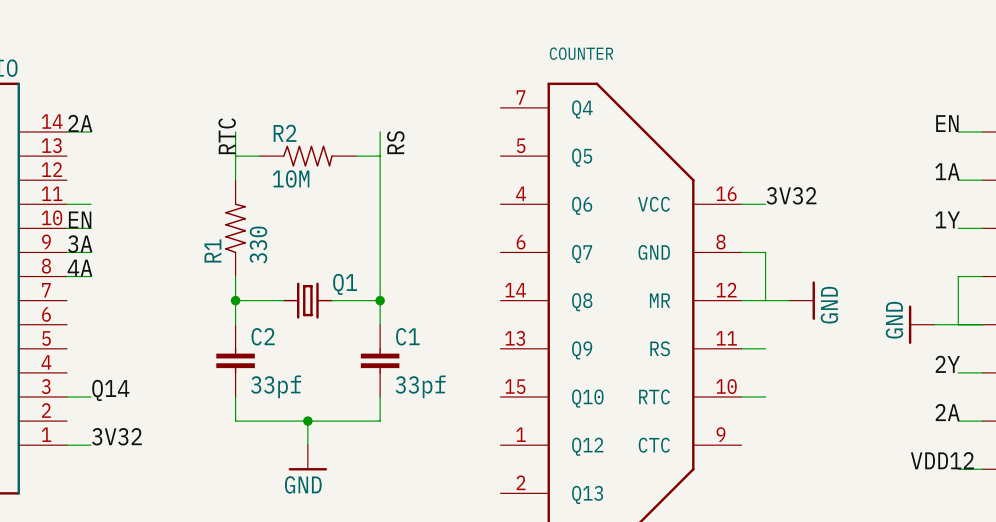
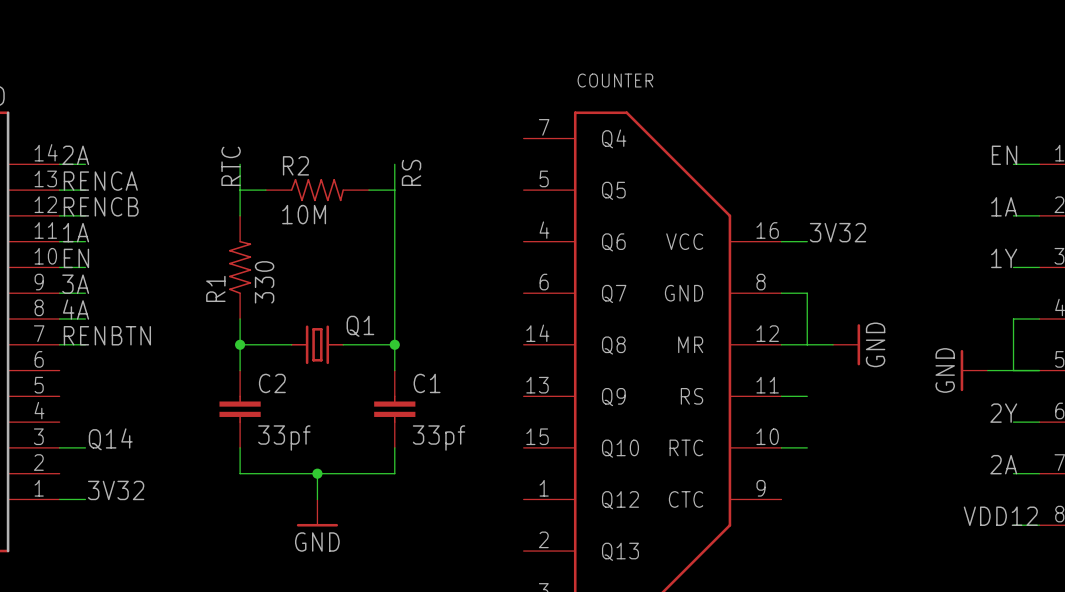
label: none -> RENCA (100, 181)
wire: none -> (59, 190) (85, 190)
label: none -> RENCB (101, 206)
wire: none -> (59, 215) (85, 215)
label: none -> 1A (76, 232)
label: none -> RENBTN (107, 335)
wire: none -> (59, 344) (85, 344)

